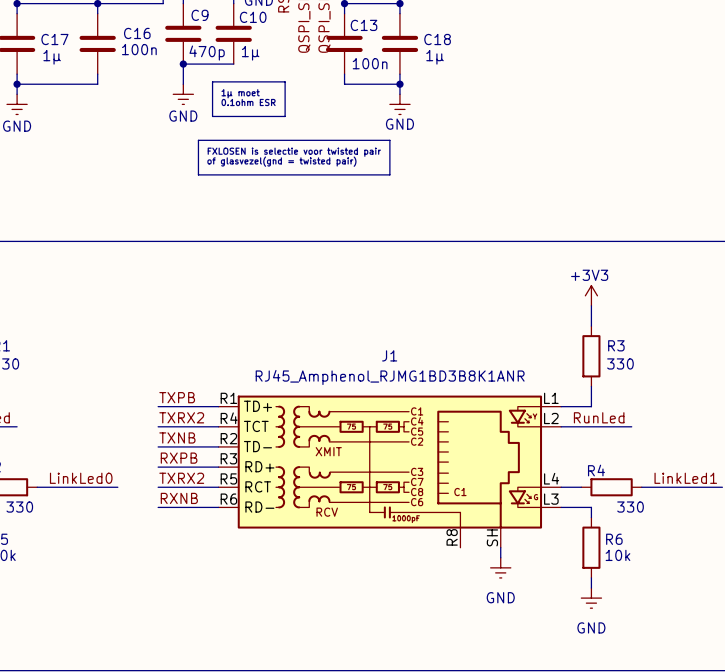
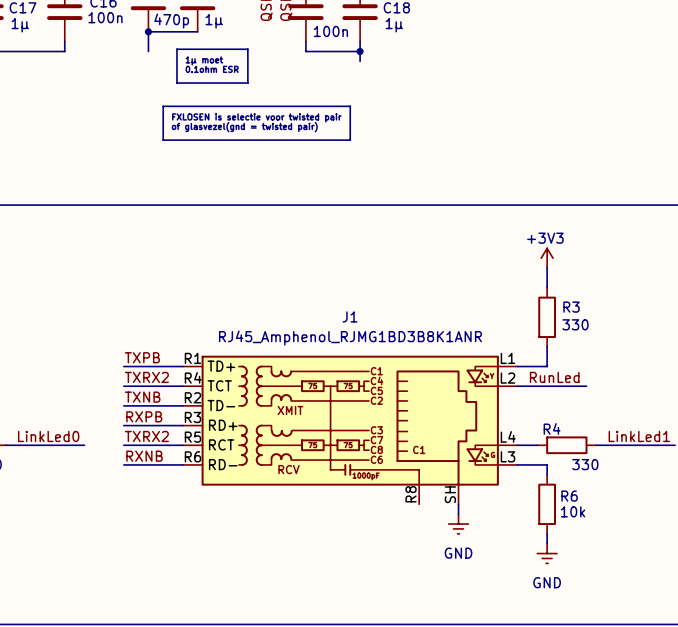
power symbol: GND (183, 94) -> none
power symbol: GND (399, 104) -> none

